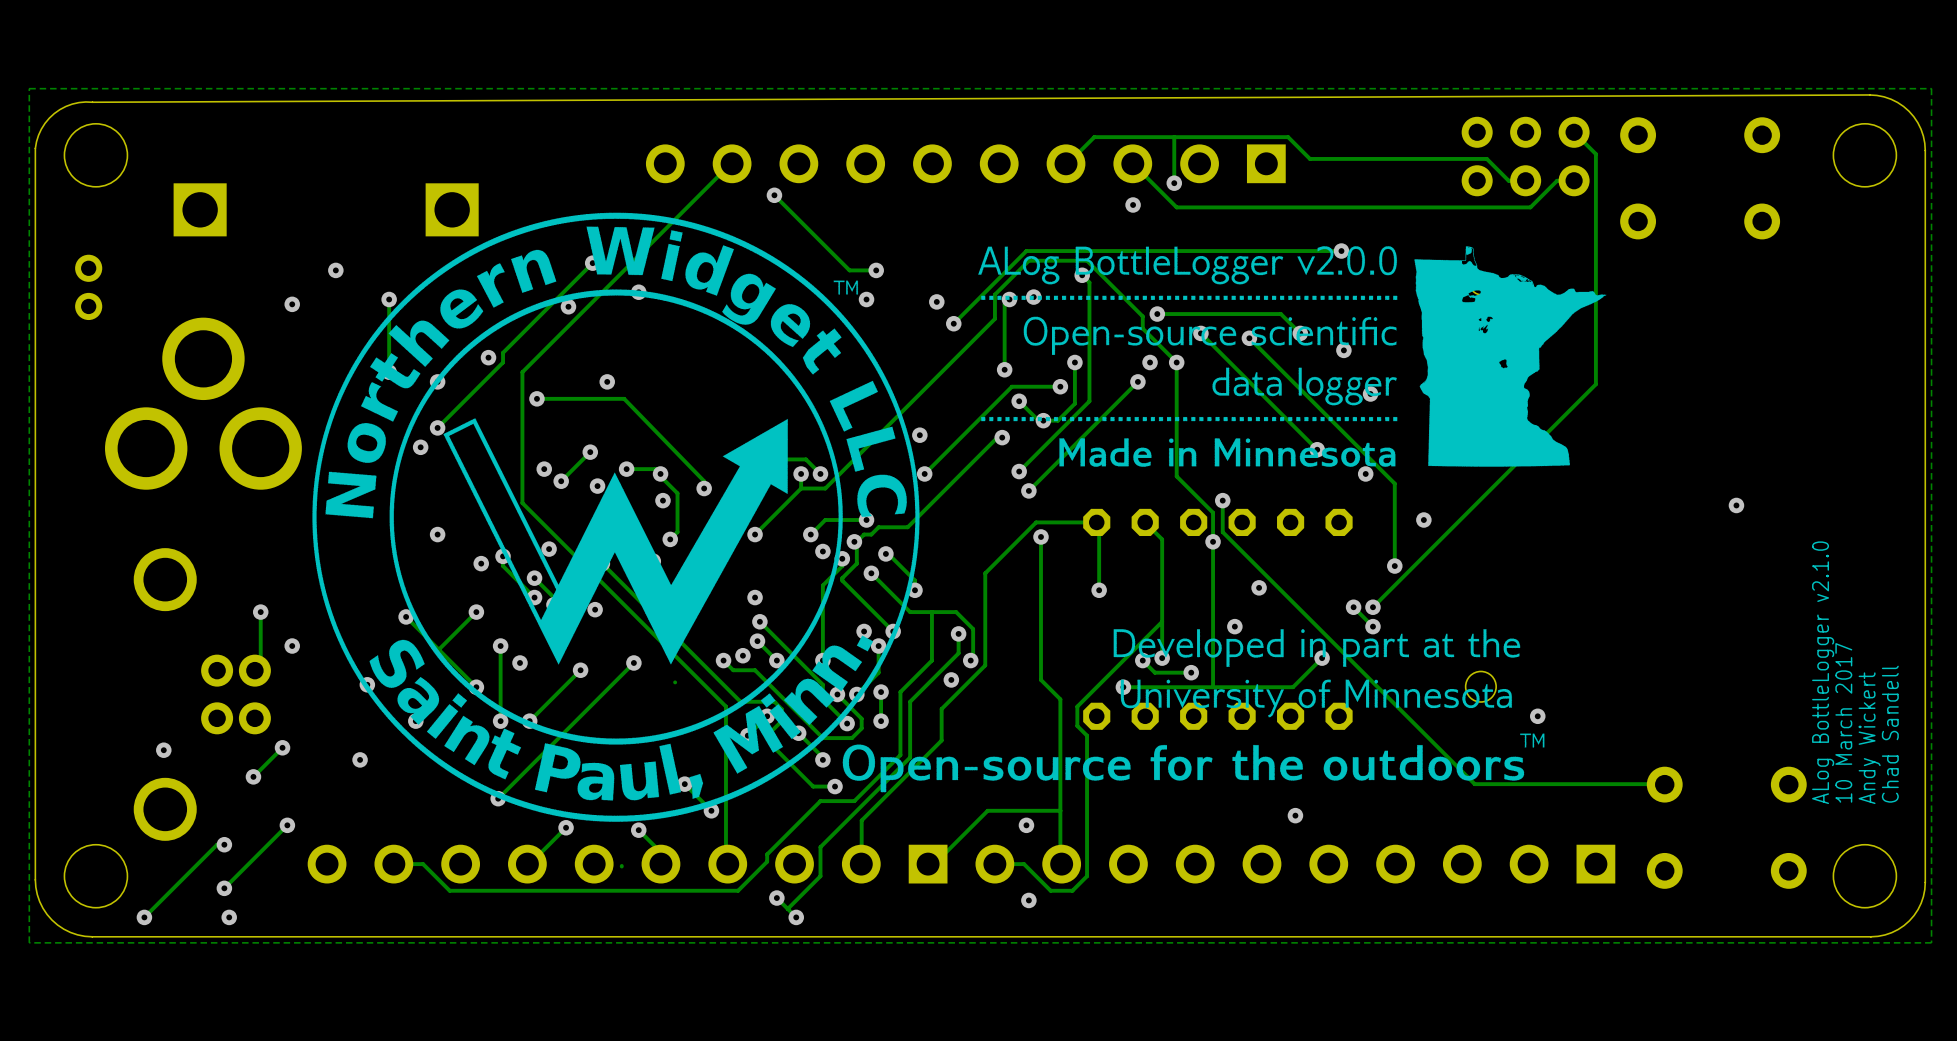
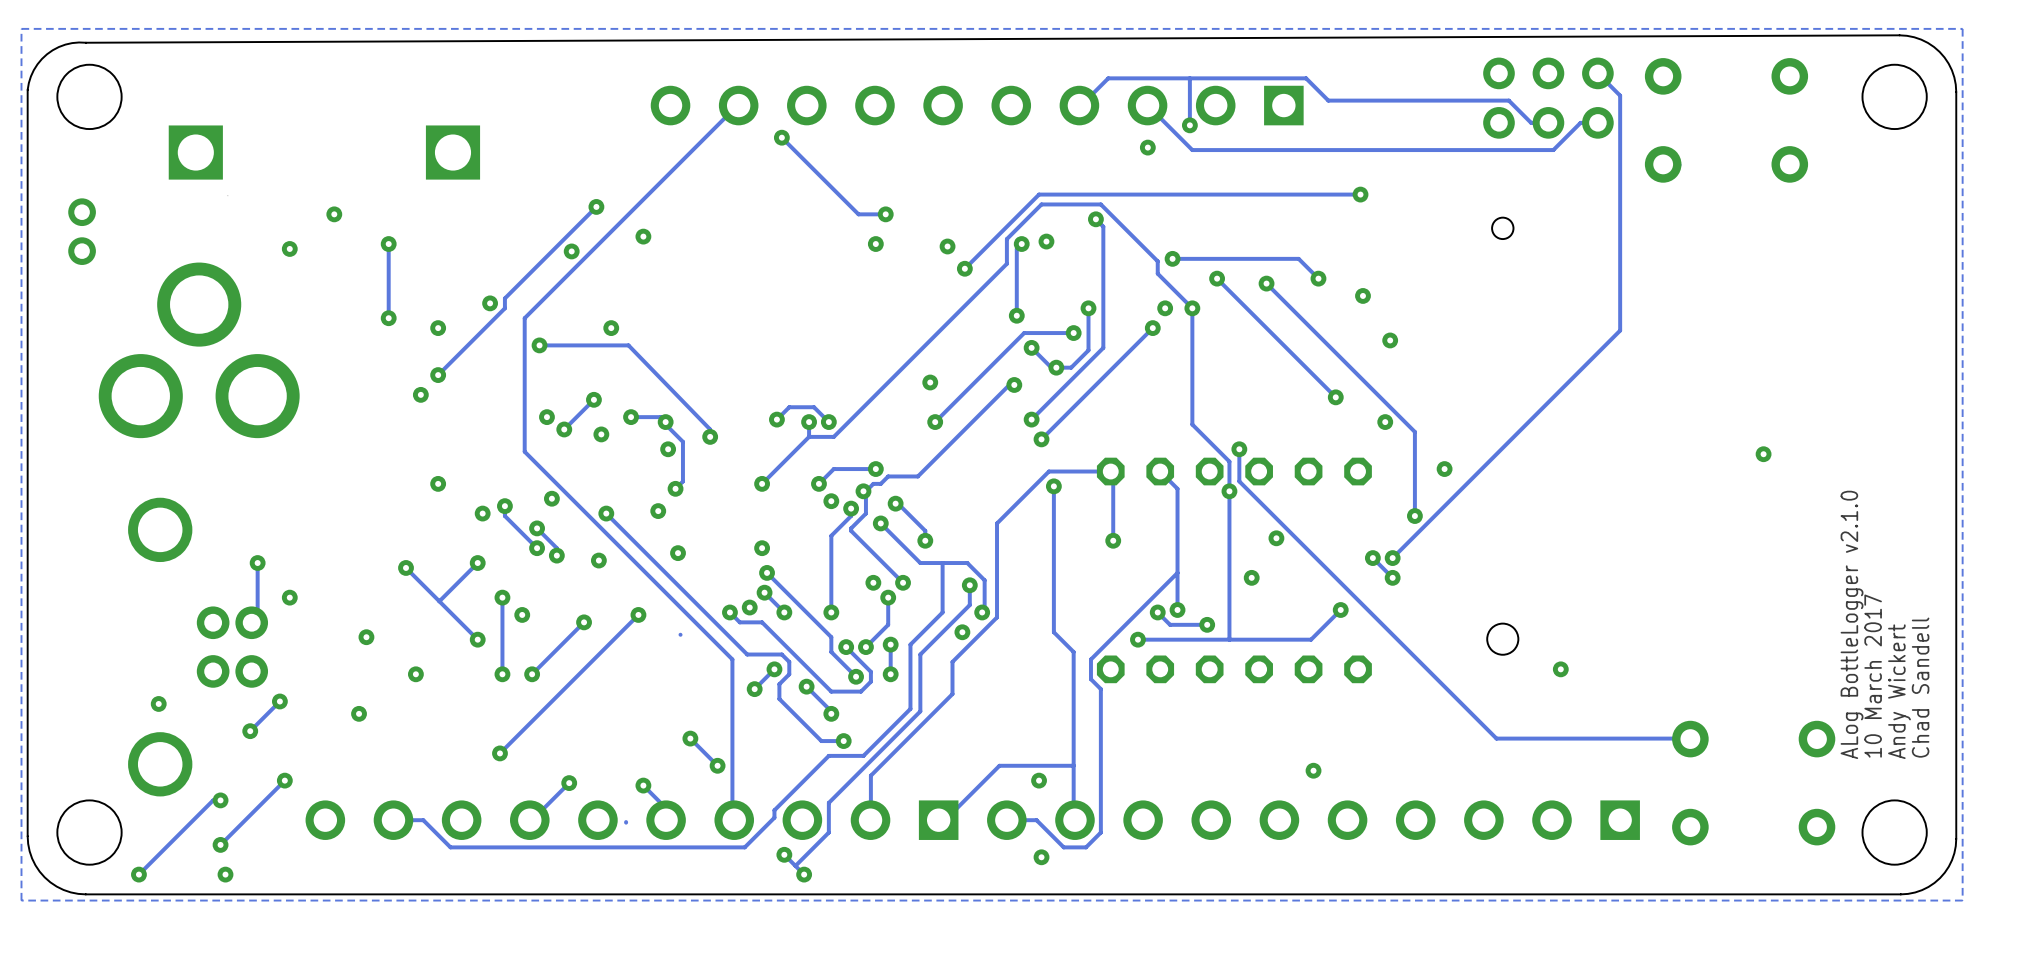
drawing: [312, 212, 1607, 822] -> none

